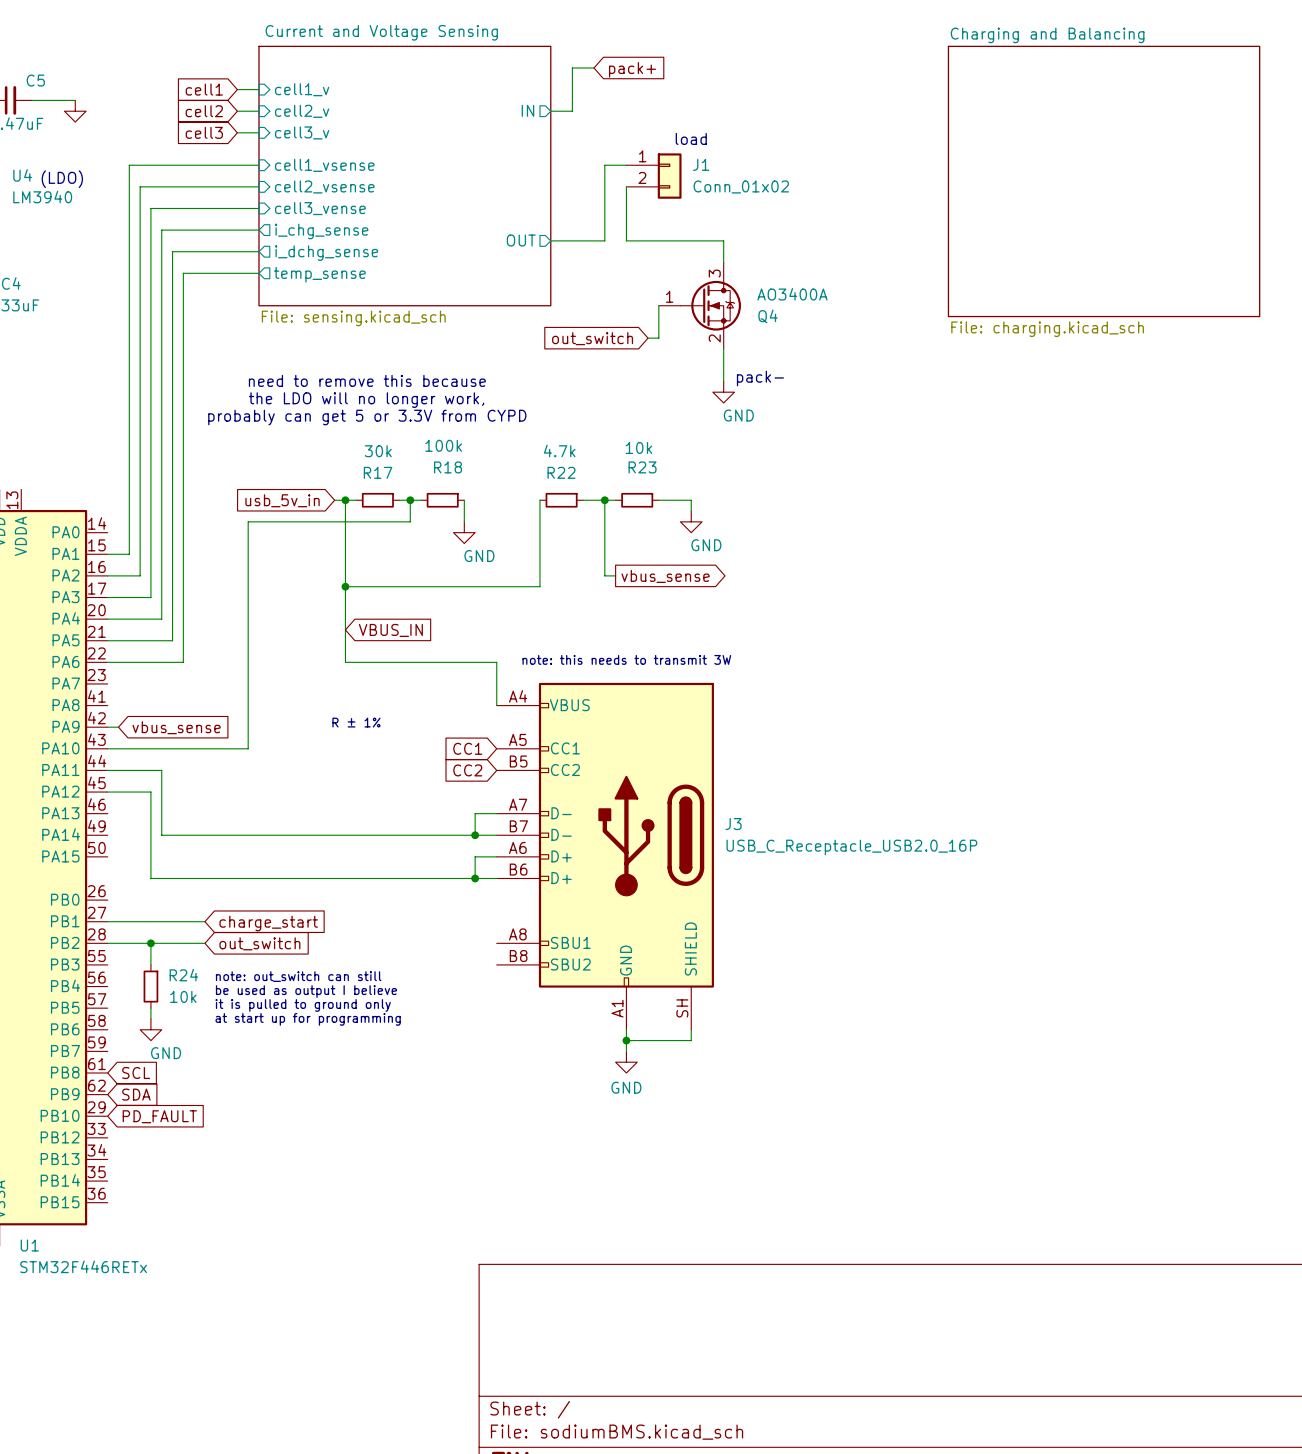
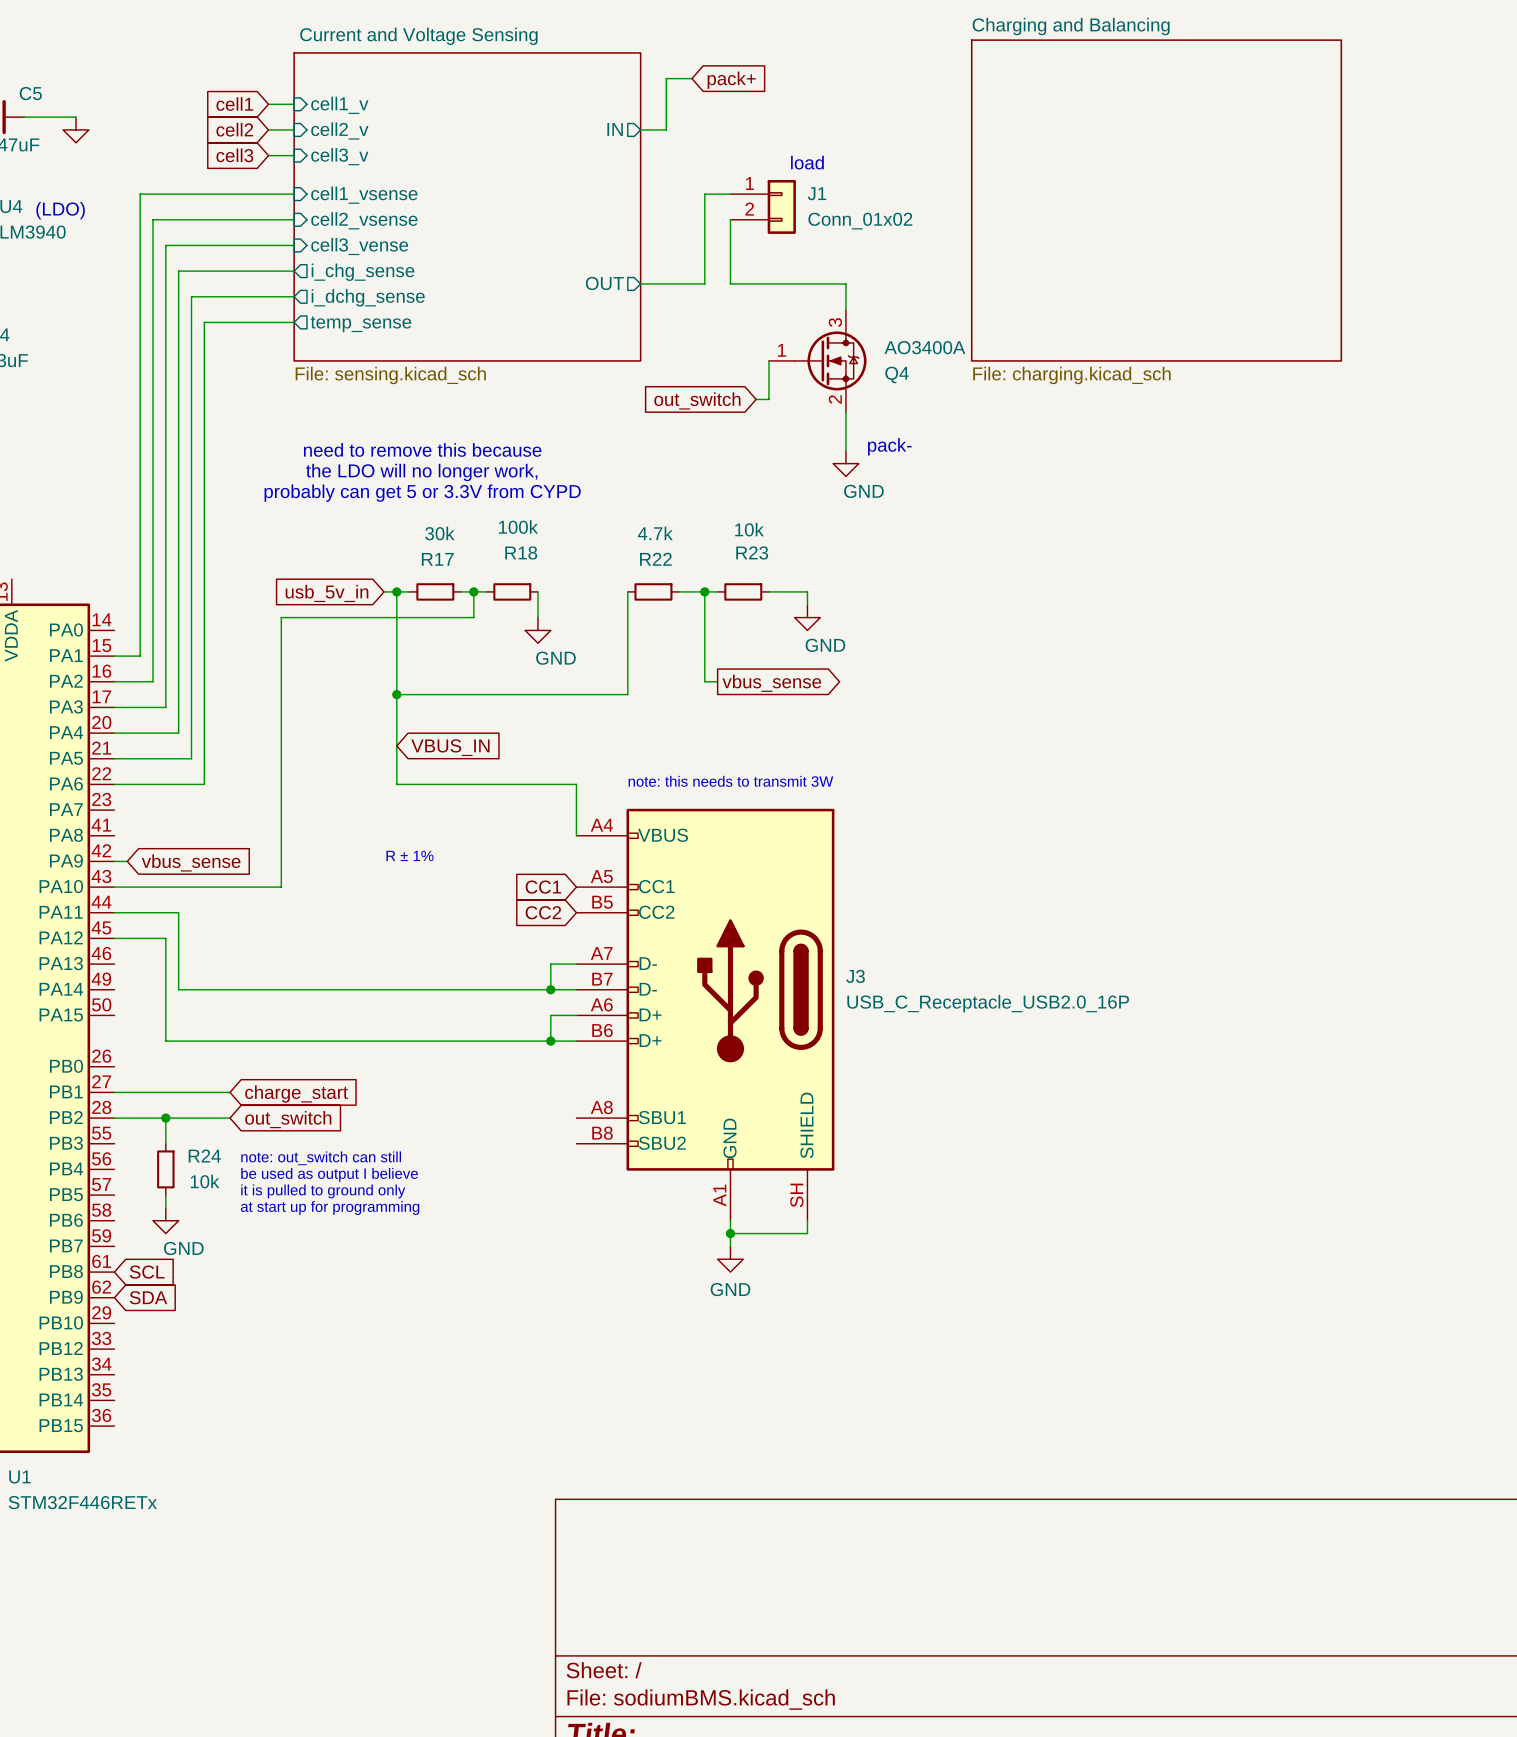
sheet Charging and Balancing position: (1104, 181) -> (1156, 200)
global label: PD_FAULT (159, 1116) -> none

